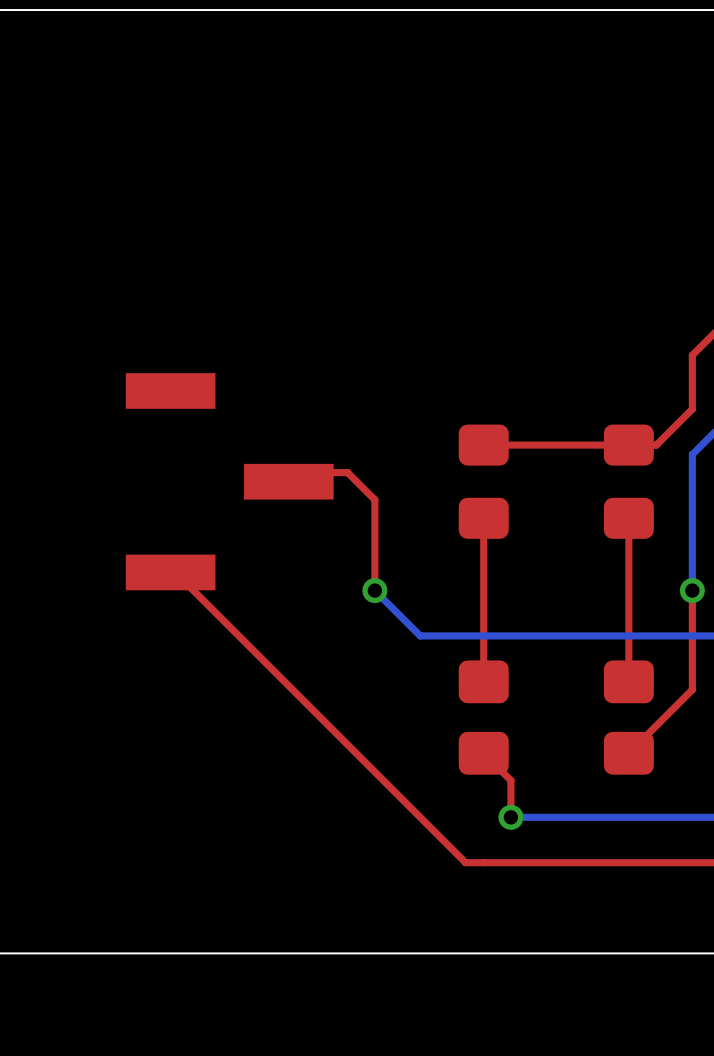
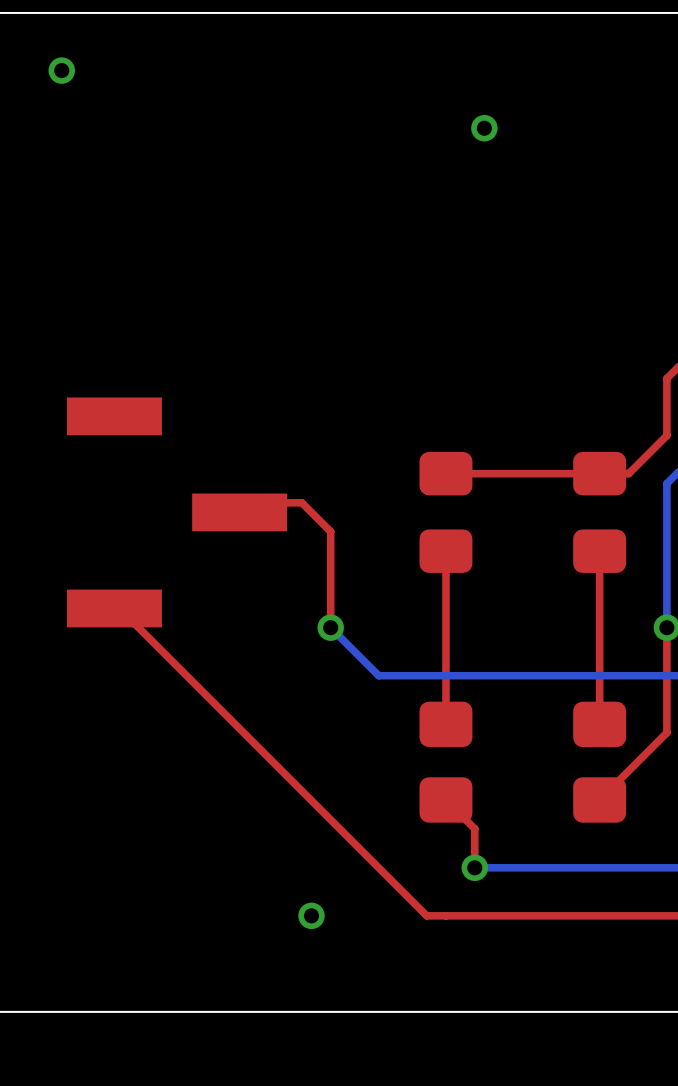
via: none -> (61, 70)
via: none -> (484, 128)
via: none -> (311, 915)

